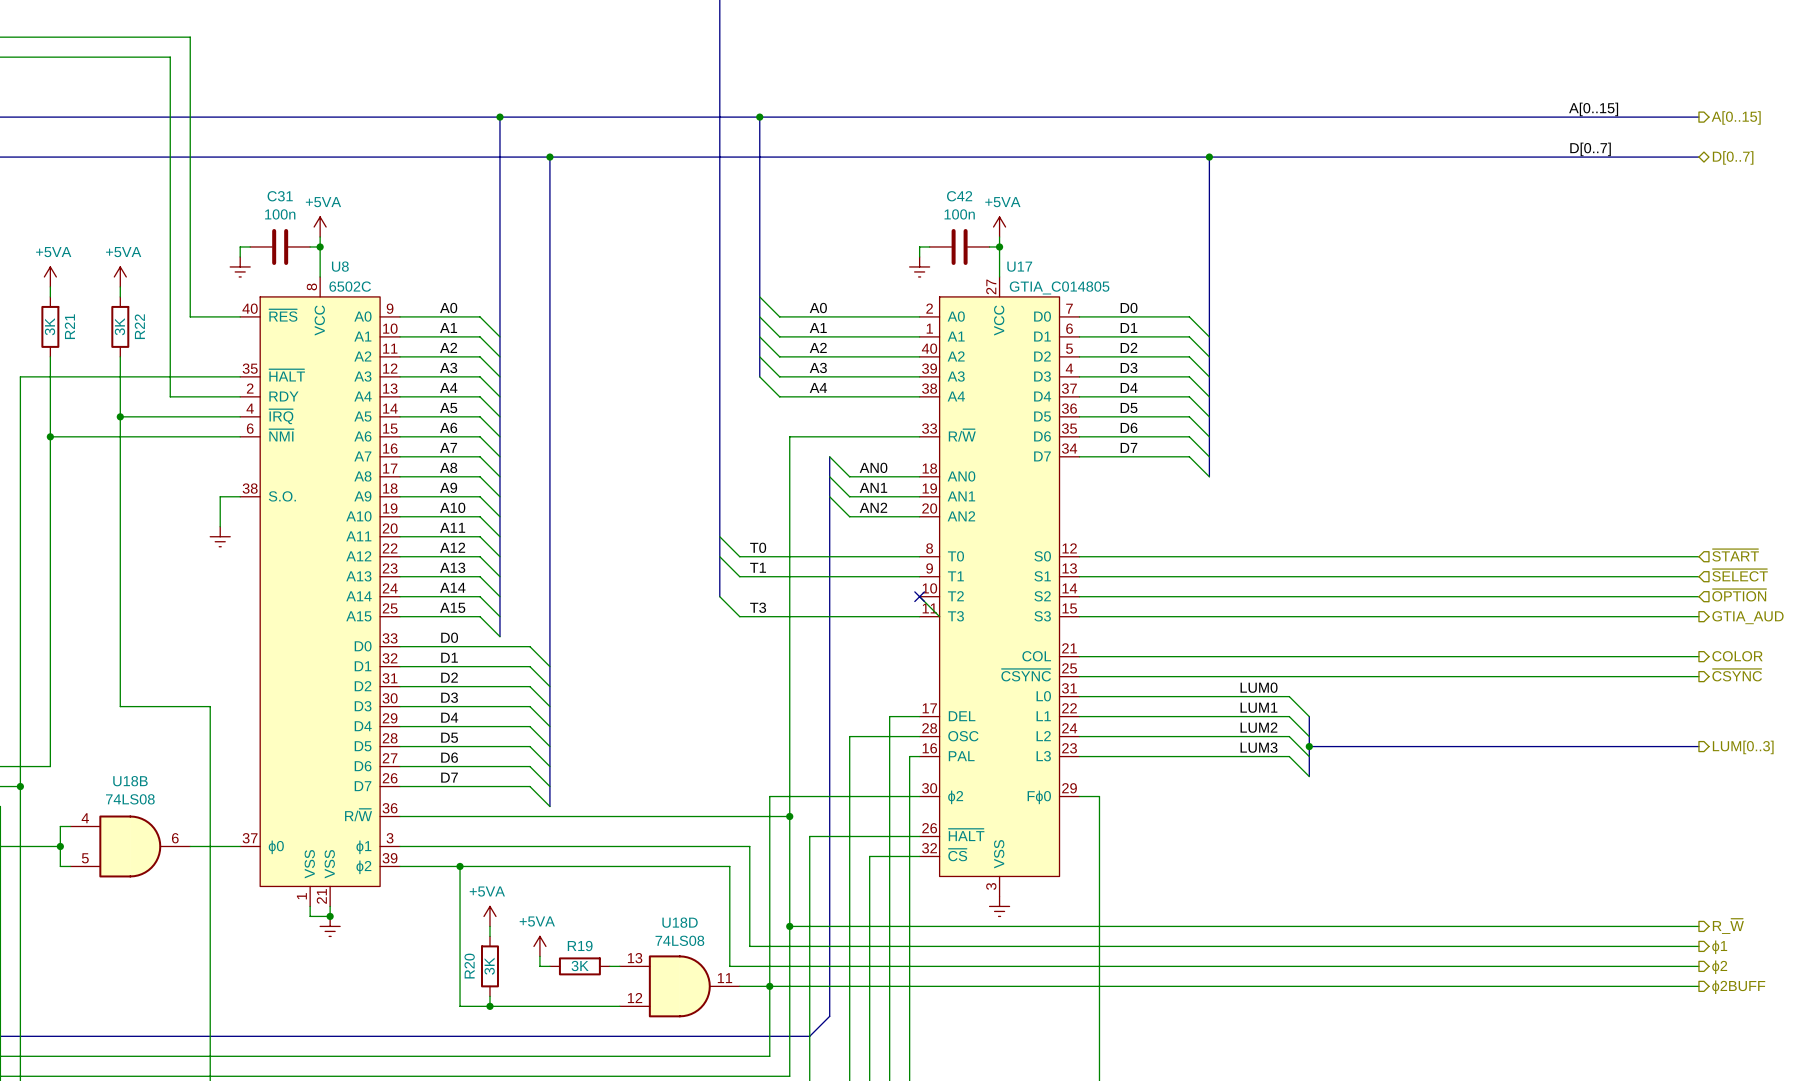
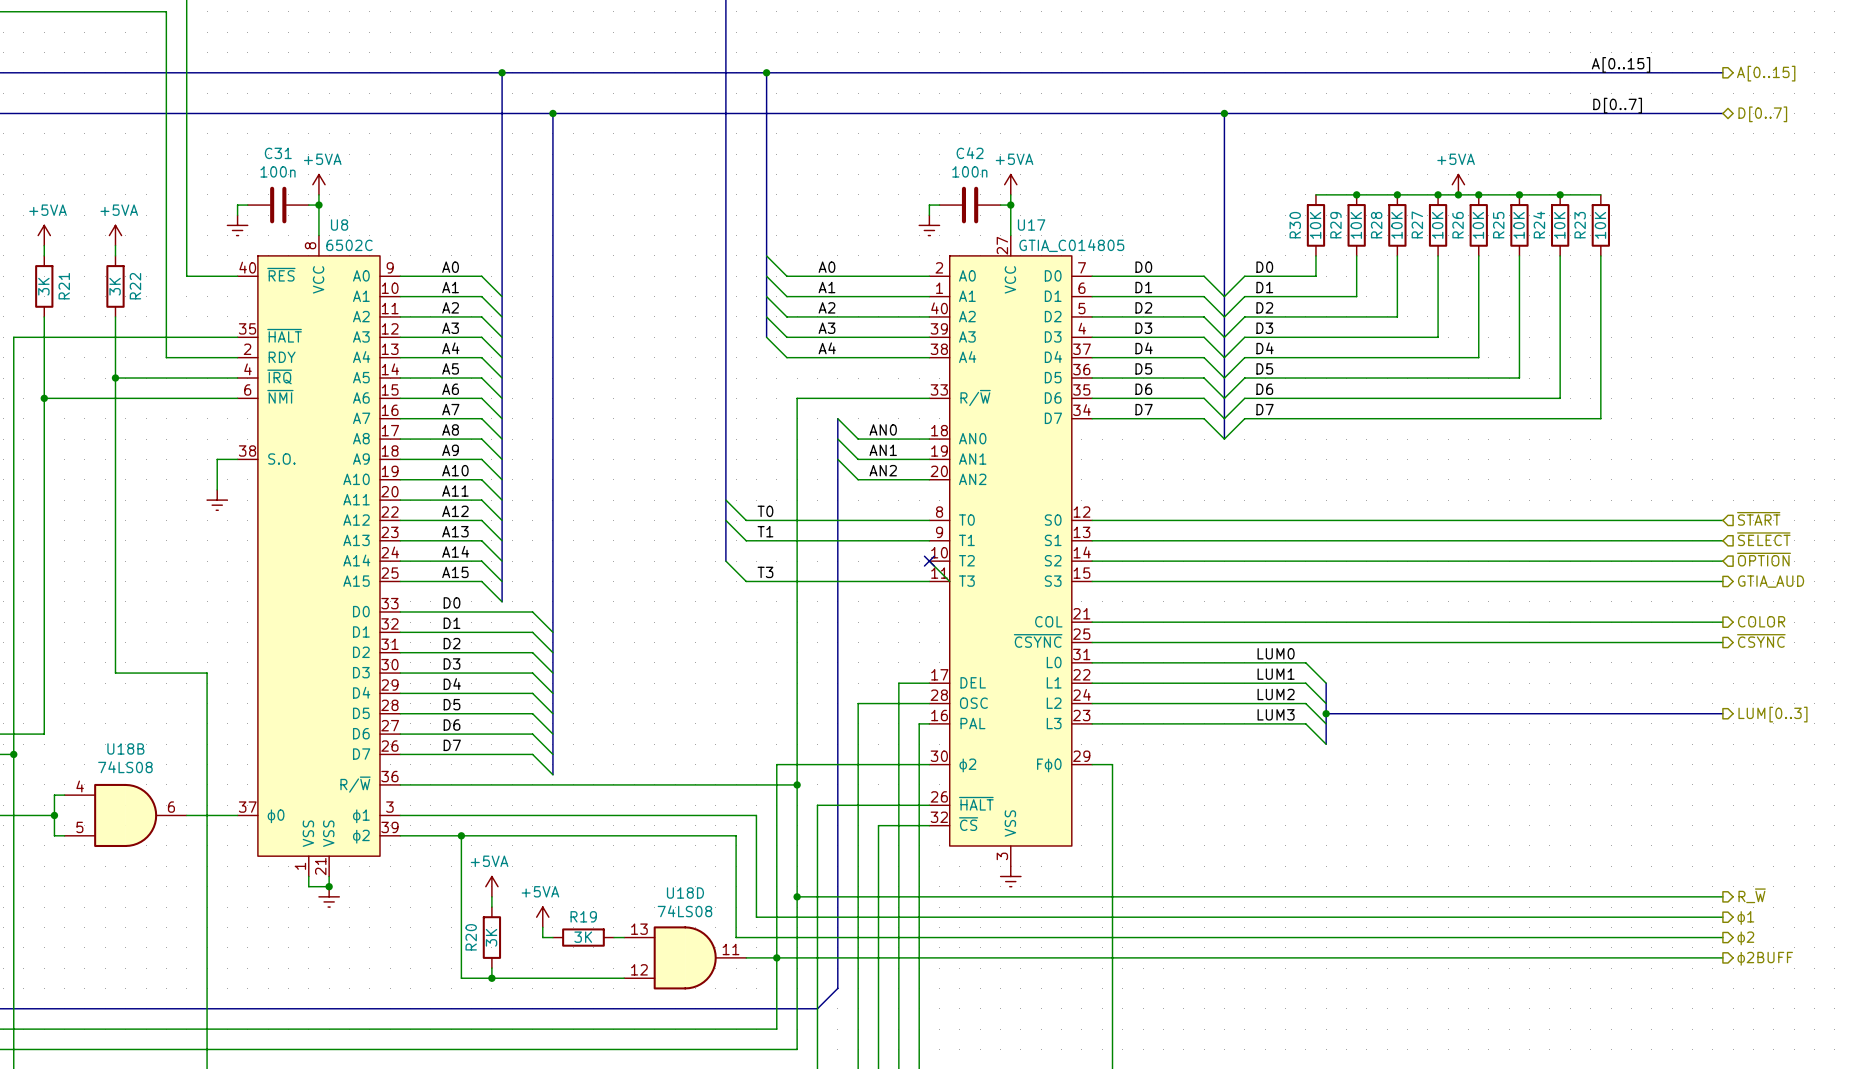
power symbol: none -> +5VA (1458, 184)
wire: none -> (1315, 194) (1600, 194)
junction: none -> (1356, 194)
junction: none -> (1397, 194)
junction: none -> (1438, 194)
junction: none -> (1458, 194)
junction: none -> (1478, 194)
junction: none -> (1519, 194)
junction: none -> (1560, 194)
R30: none -> 10K (1315, 225)
R29: none -> 10K (1356, 225)
R28: none -> 10K (1397, 225)
R27: none -> 10K (1438, 225)
R26: none -> 10K (1478, 225)
R25: none -> 10K (1519, 225)
R24: none -> 10K (1560, 225)
R23: none -> 10K (1600, 225)
wire: none -> (1315, 255) (1315, 276) (1244, 276) (1224, 296)
wire: none -> (1356, 255) (1356, 296) (1244, 296) (1224, 316)
wire: none -> (1397, 255) (1397, 316) (1244, 316) (1224, 337)
wire: none -> (1438, 255) (1438, 337) (1244, 337) (1224, 357)
wire: none -> (1478, 255) (1478, 357) (1244, 357) (1224, 378)
wire: none -> (1519, 255) (1519, 378) (1244, 378) (1224, 398)
wire: none -> (1560, 255) (1560, 398) (1244, 398) (1224, 418)
wire: none -> (1600, 255) (1600, 418) (1244, 418) (1224, 439)
label: none -> D0 (1264, 267)
label: none -> D1 (1264, 287)
label: none -> D2 (1264, 307)
label: none -> D3 (1264, 328)
label: none -> D4 (1265, 348)
label: none -> D5 (1264, 368)
label: none -> D6 (1264, 389)
label: none -> D7 (1265, 409)

